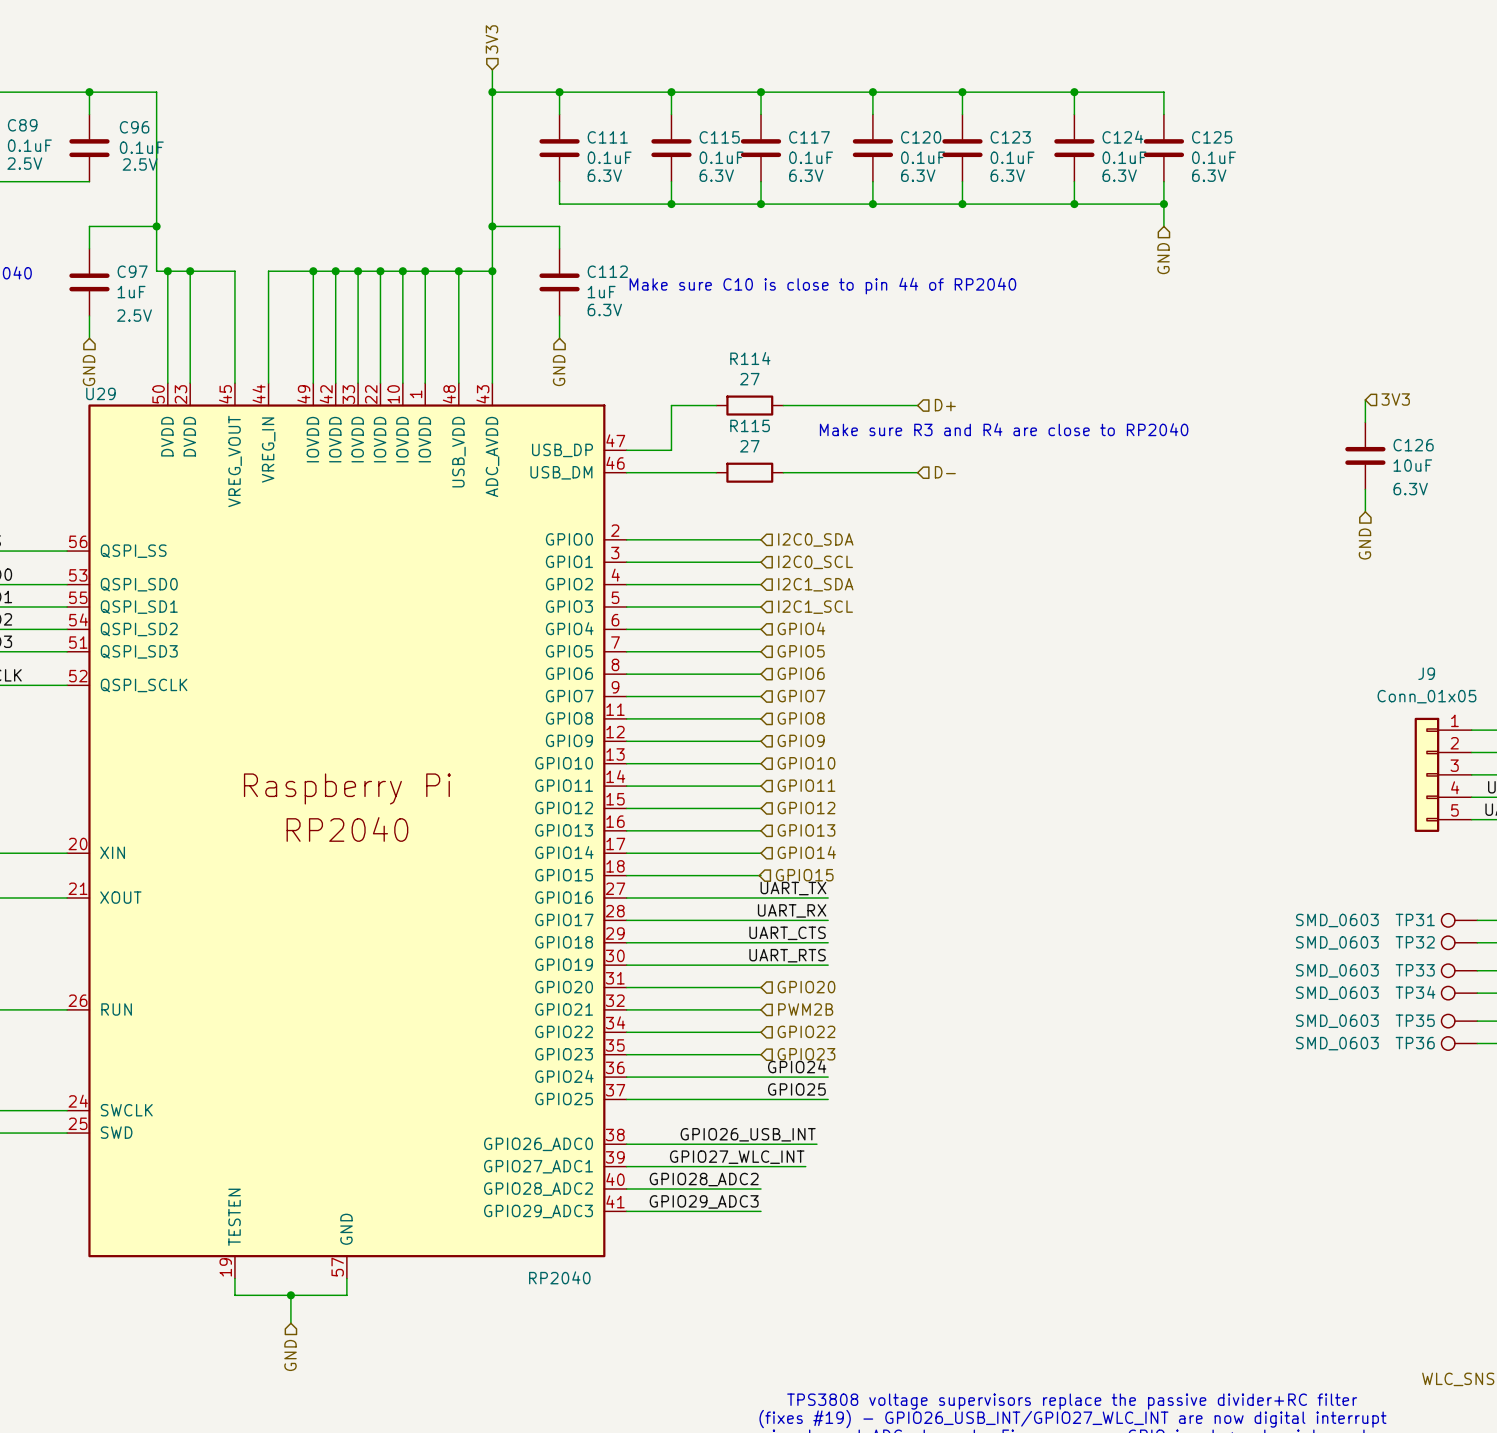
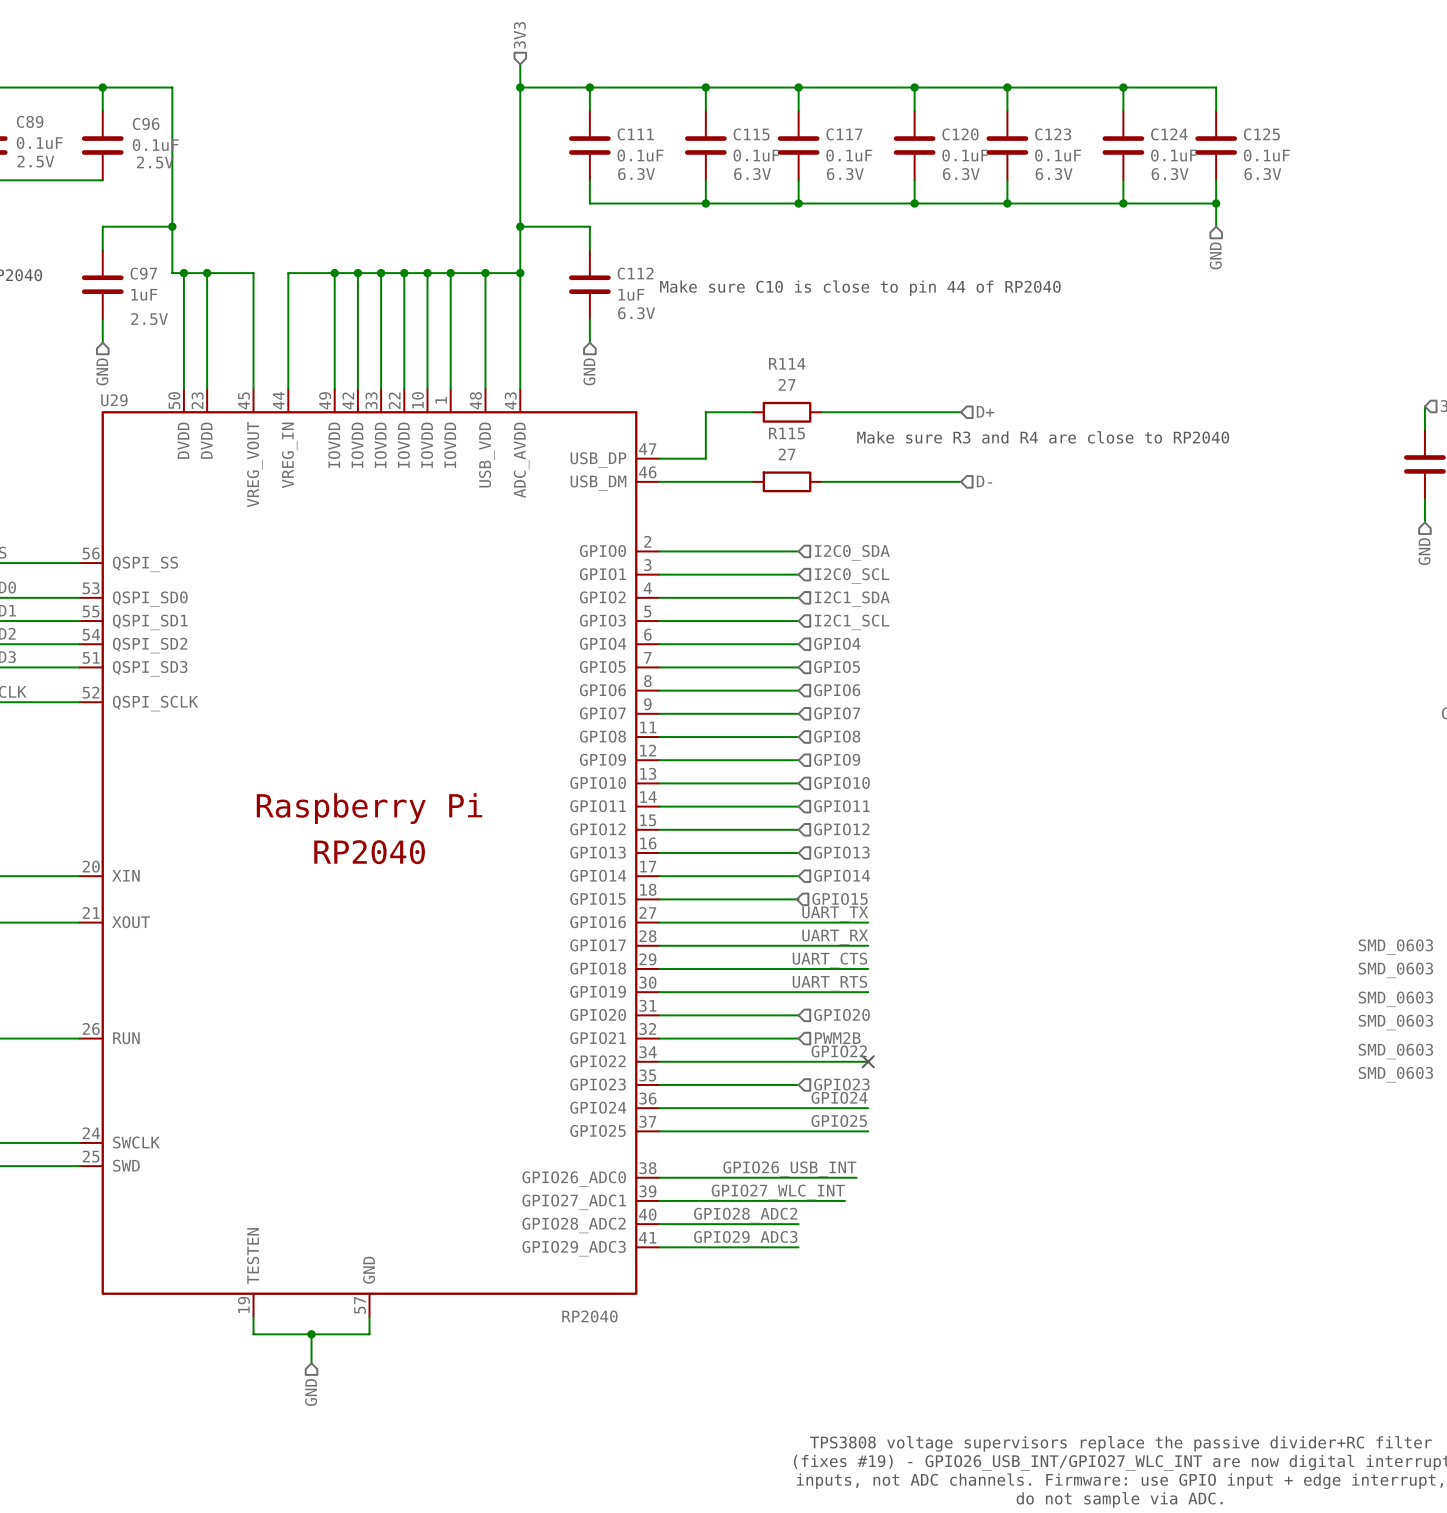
label: none -> GPIO22 (839, 1051)
hierarchical label: GPIO22 (806, 1031) -> none
wire: none -> (798, 1061) (868, 1061)
no-connect mark: none -> (868, 1061)

